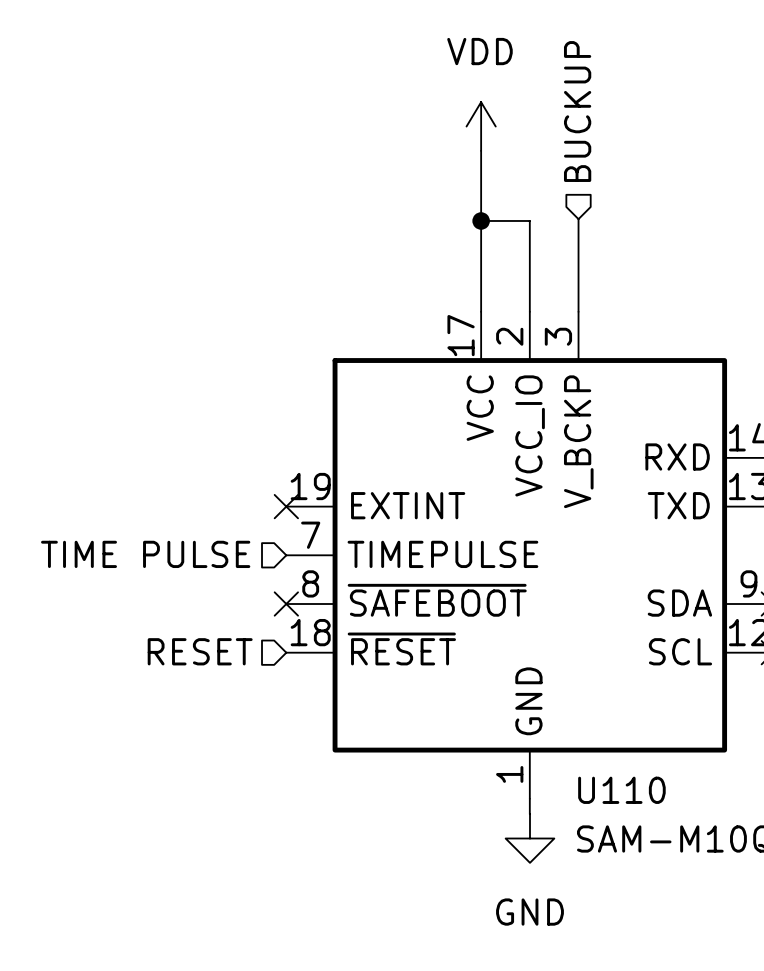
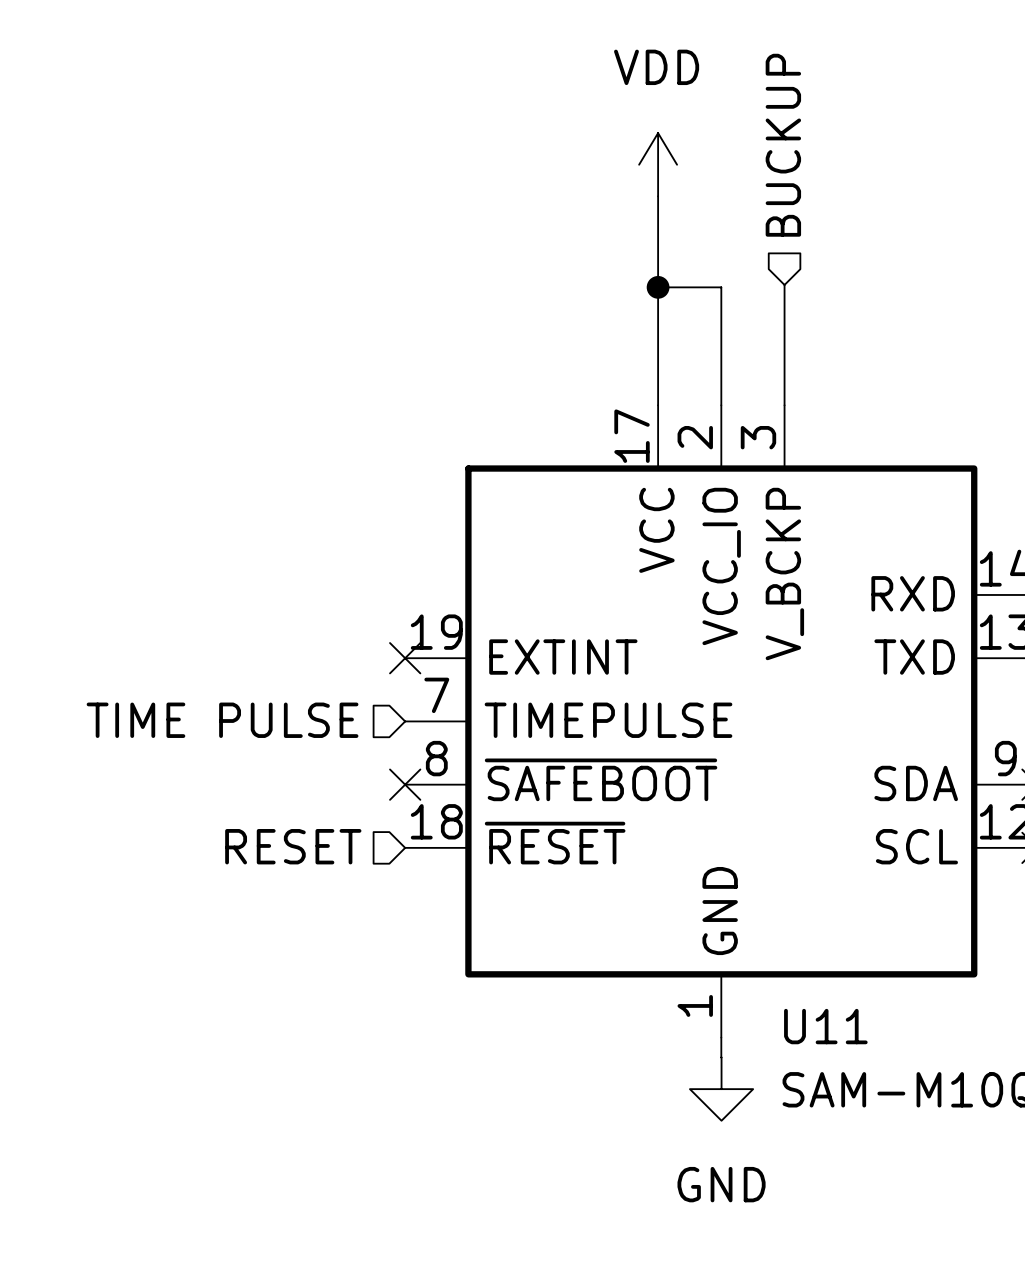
U110 name: U110 (621, 790) -> U11 (825, 1026)

